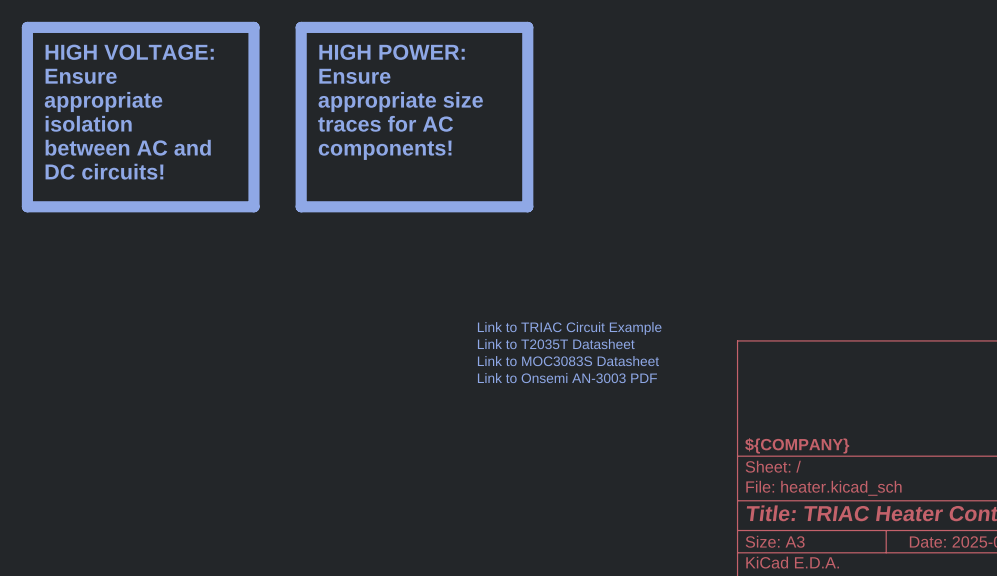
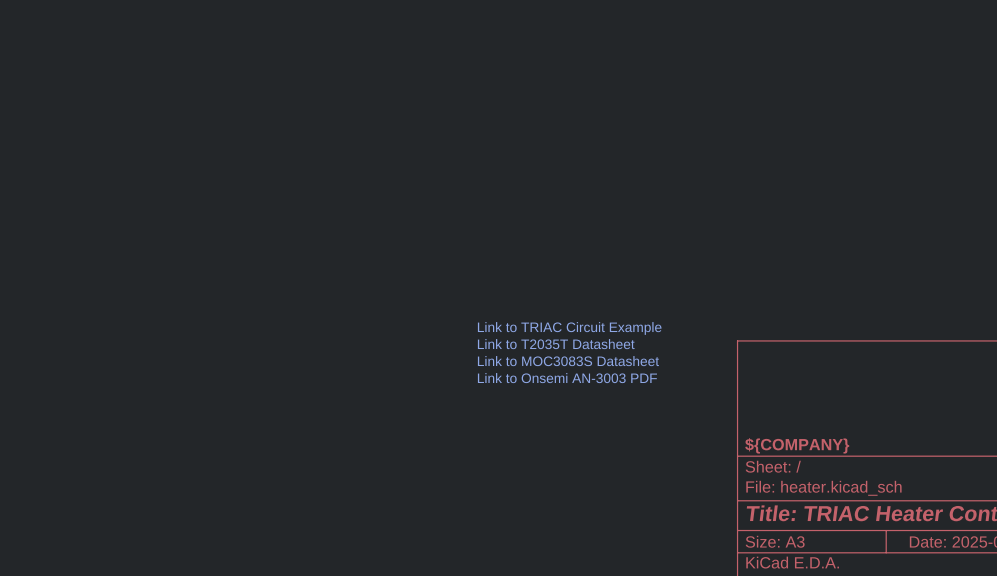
line: (27, 27) (253, 27) (253, 206) (27, 206) (27, 27) -> none
line: (301, 27) (527, 27) (527, 206) (301, 206) (301, 27) -> none
text: HIGH VOLTAGE: (129, 52) -> none
text: HIGH POWER: (392, 52) -> none
text: Ensure (81, 76) -> none
text: Ensure (354, 76) -> none
text: appropriate (103, 101) -> none
text: appropriate size (400, 101) -> none
text: isolation (88, 123) -> none
text: traces for AC (385, 123) -> none
text: between AC and (128, 147) -> none
text: components! (385, 150) -> none
text: DC circuits! (104, 171) -> none

